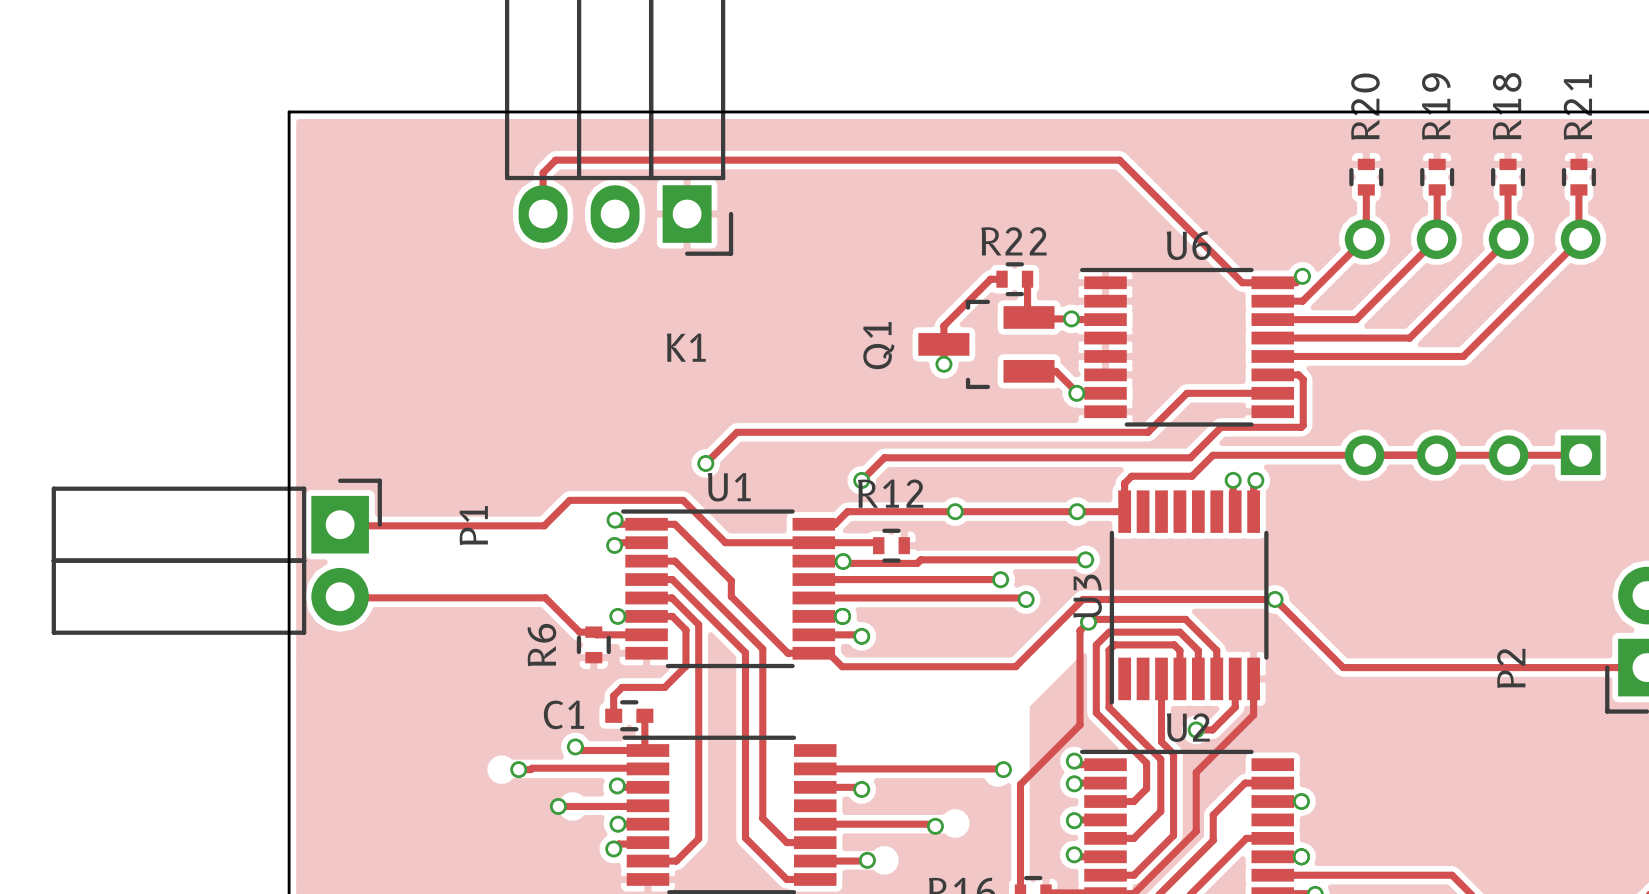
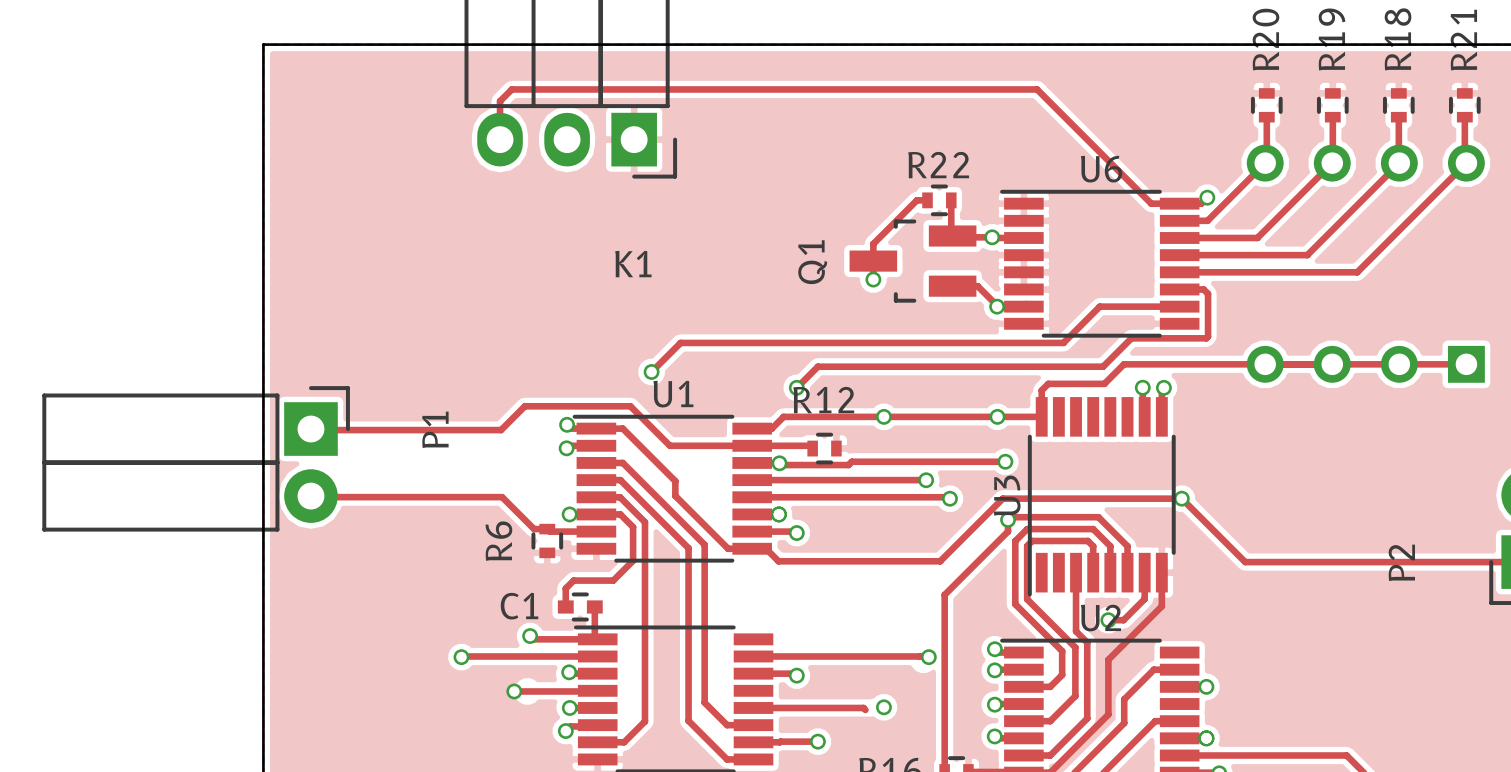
track: (1088, 622) (1080, 630) (1080, 724) (1020, 784) -> (1008, 519) (1008, 531) (944, 594) (944, 671)
track: (647, 768) (518, 769) -> (597, 656) (461, 657)
via position: (518, 769) -> (461, 657)
via position: (935, 826) -> (883, 707)
track: (867, 860) (843, 861) -> (817, 741) (779, 742)
via position: (867, 860) -> (817, 741)

